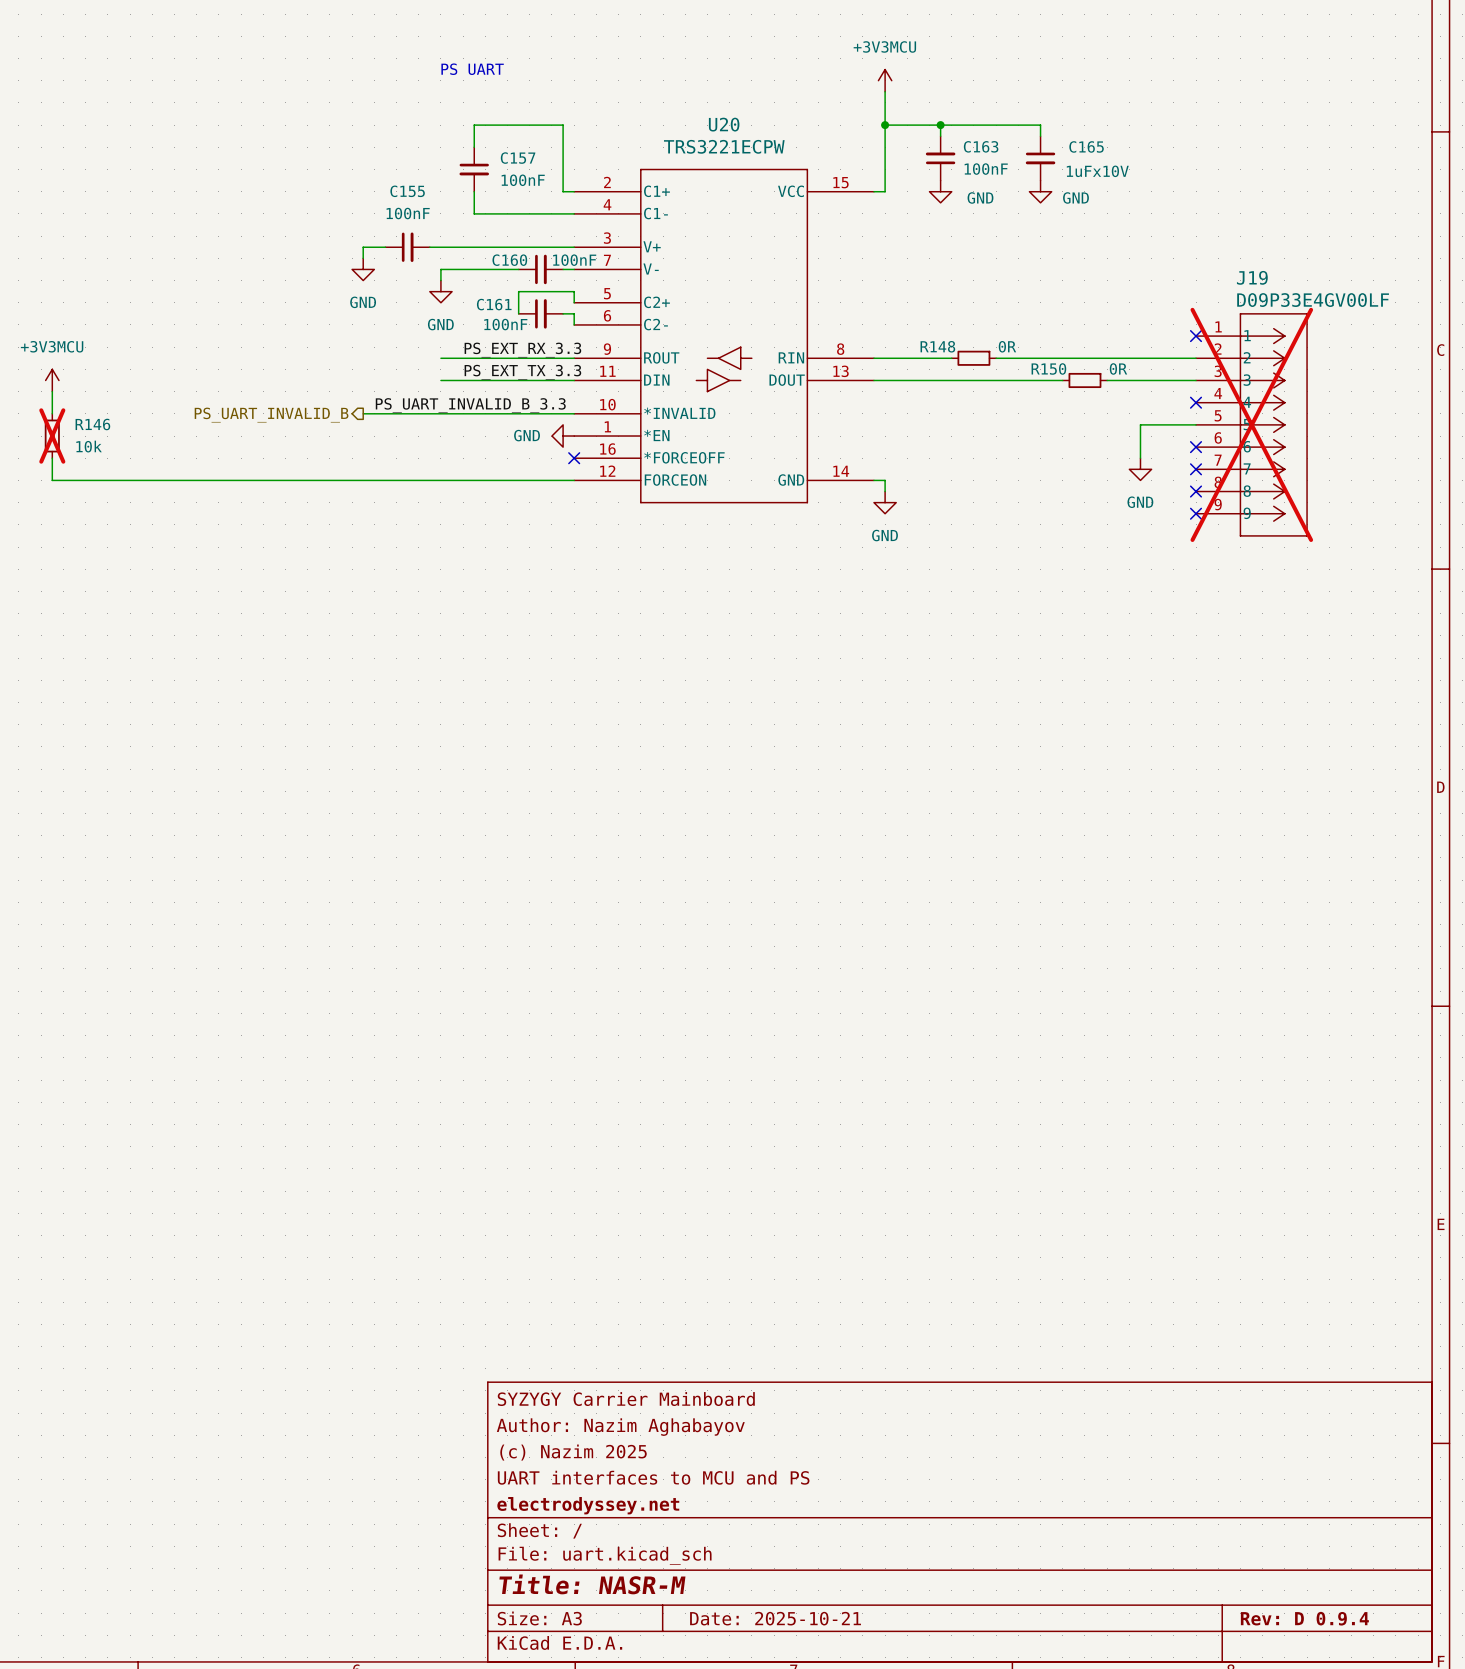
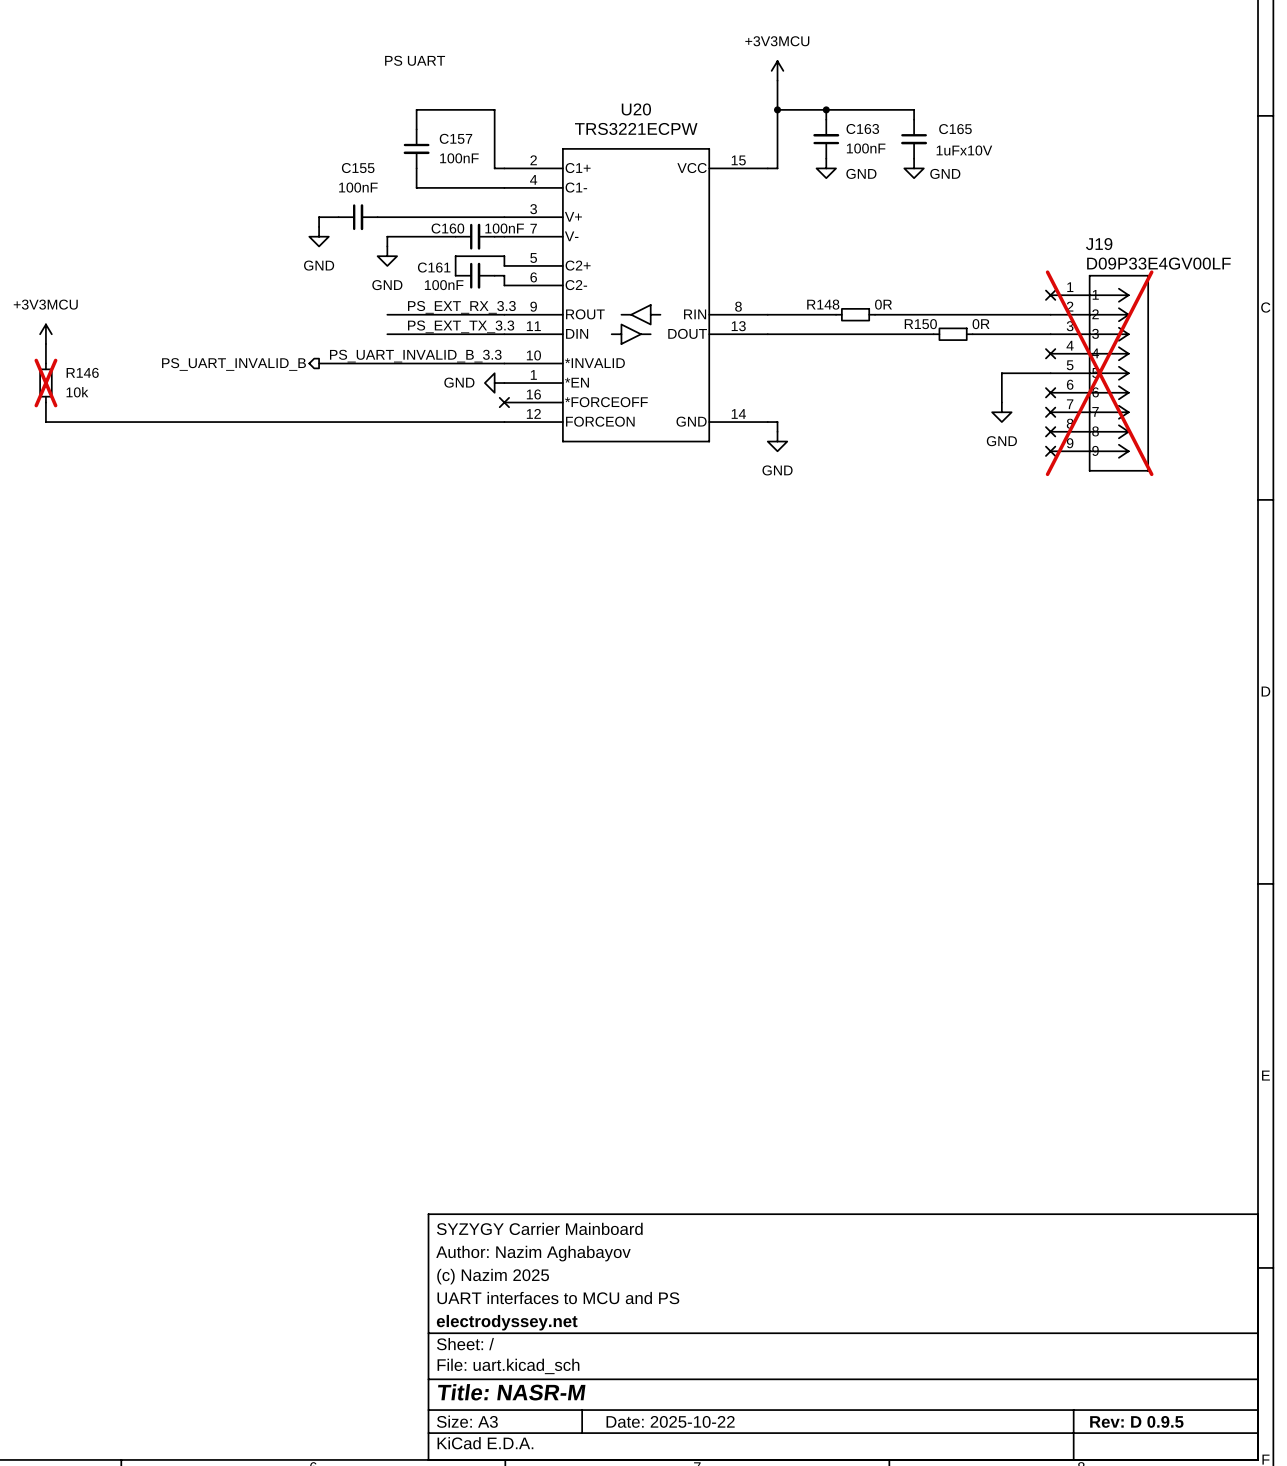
title block: Date: 2025-10-21 (775, 1618) -> Date: 2025-10-22 (670, 1421)
title block: Rev: D 0.9.4 (1304, 1618) -> Rev: D 0.9.5 (1136, 1421)

